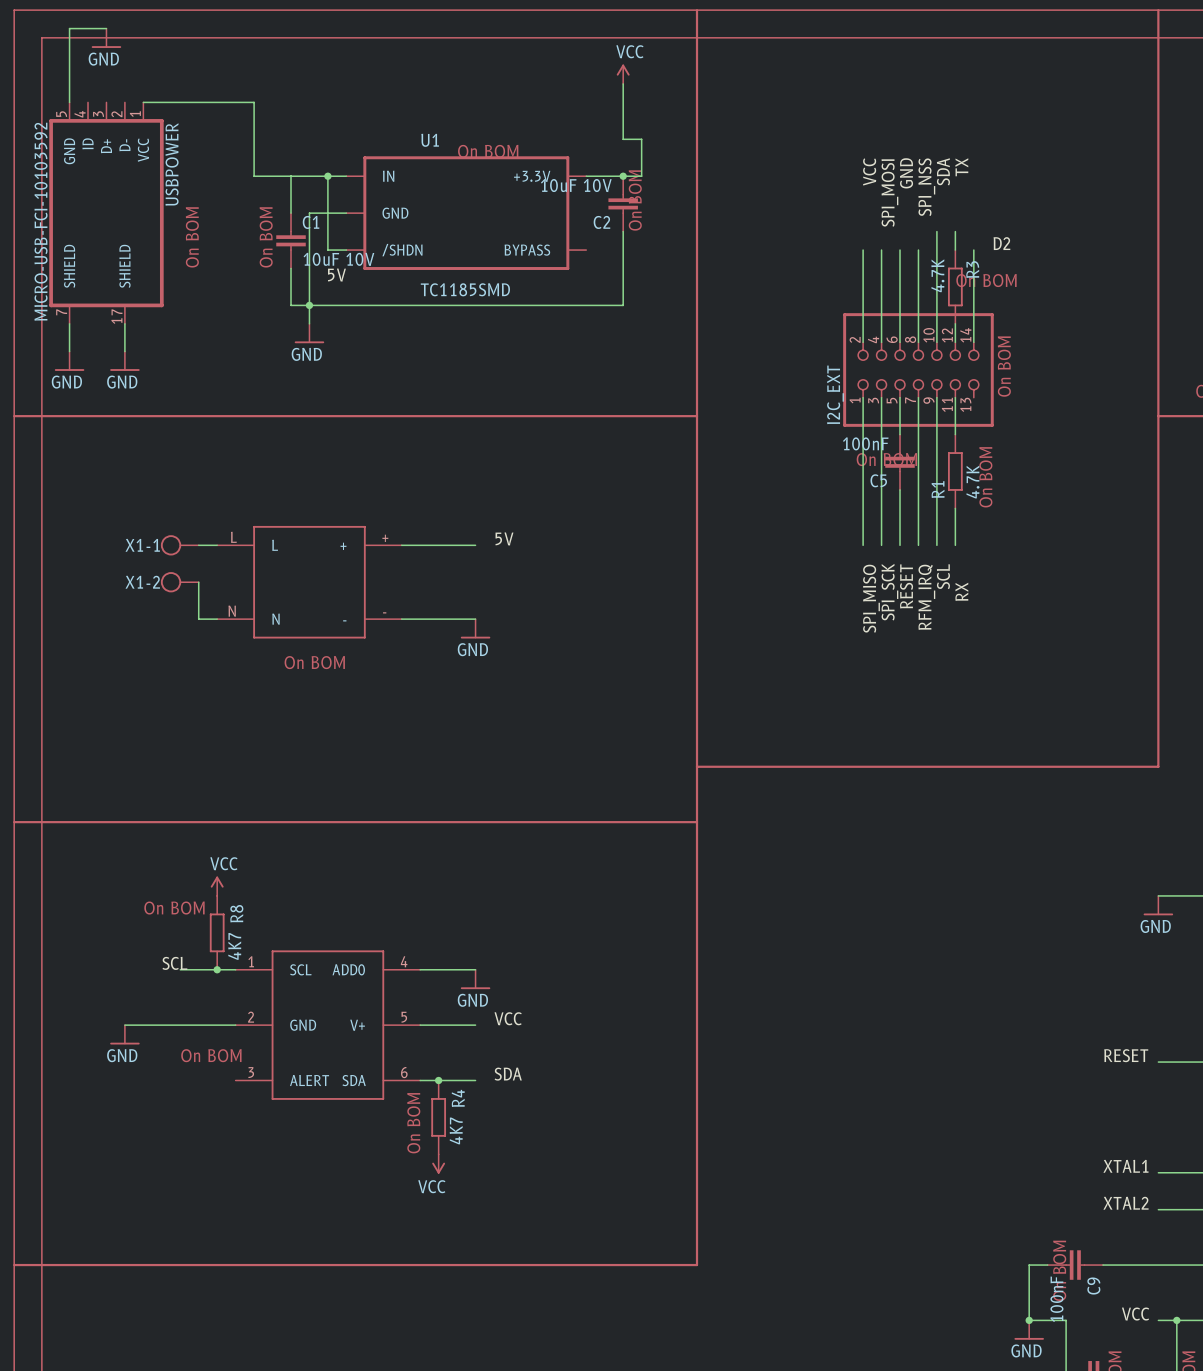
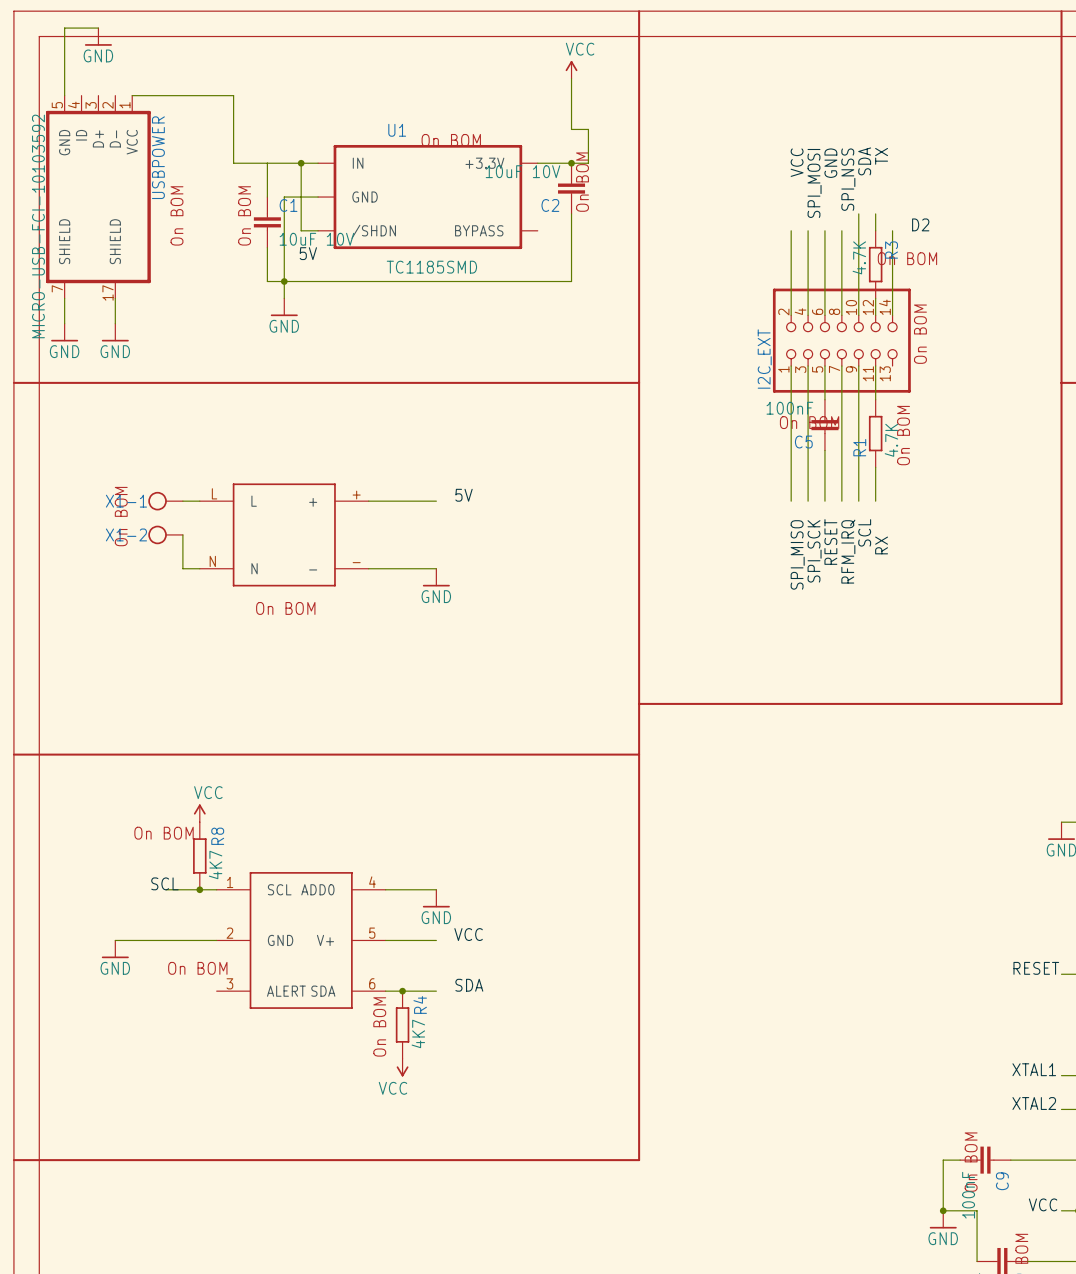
text: none -> On BOM (121, 516)

